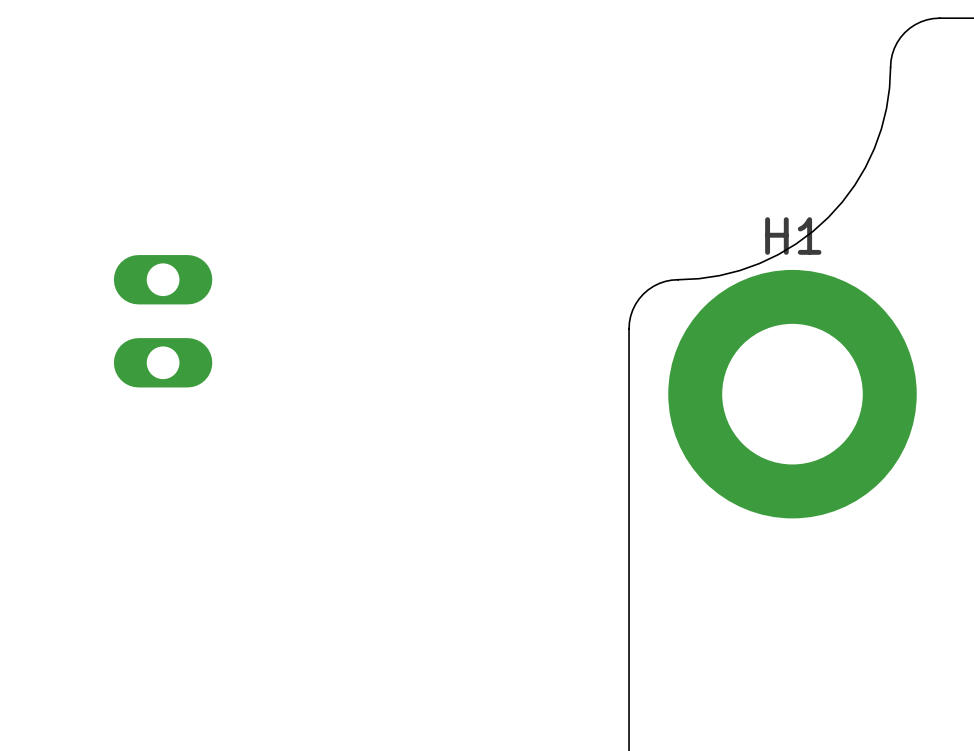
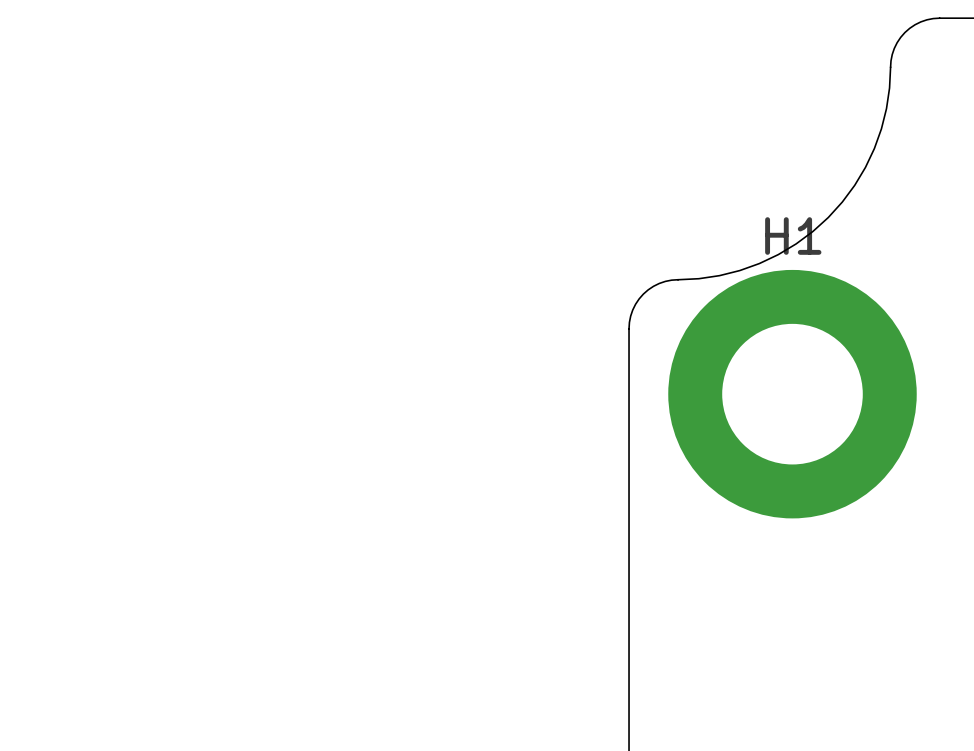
part: (163, 321) -> none

